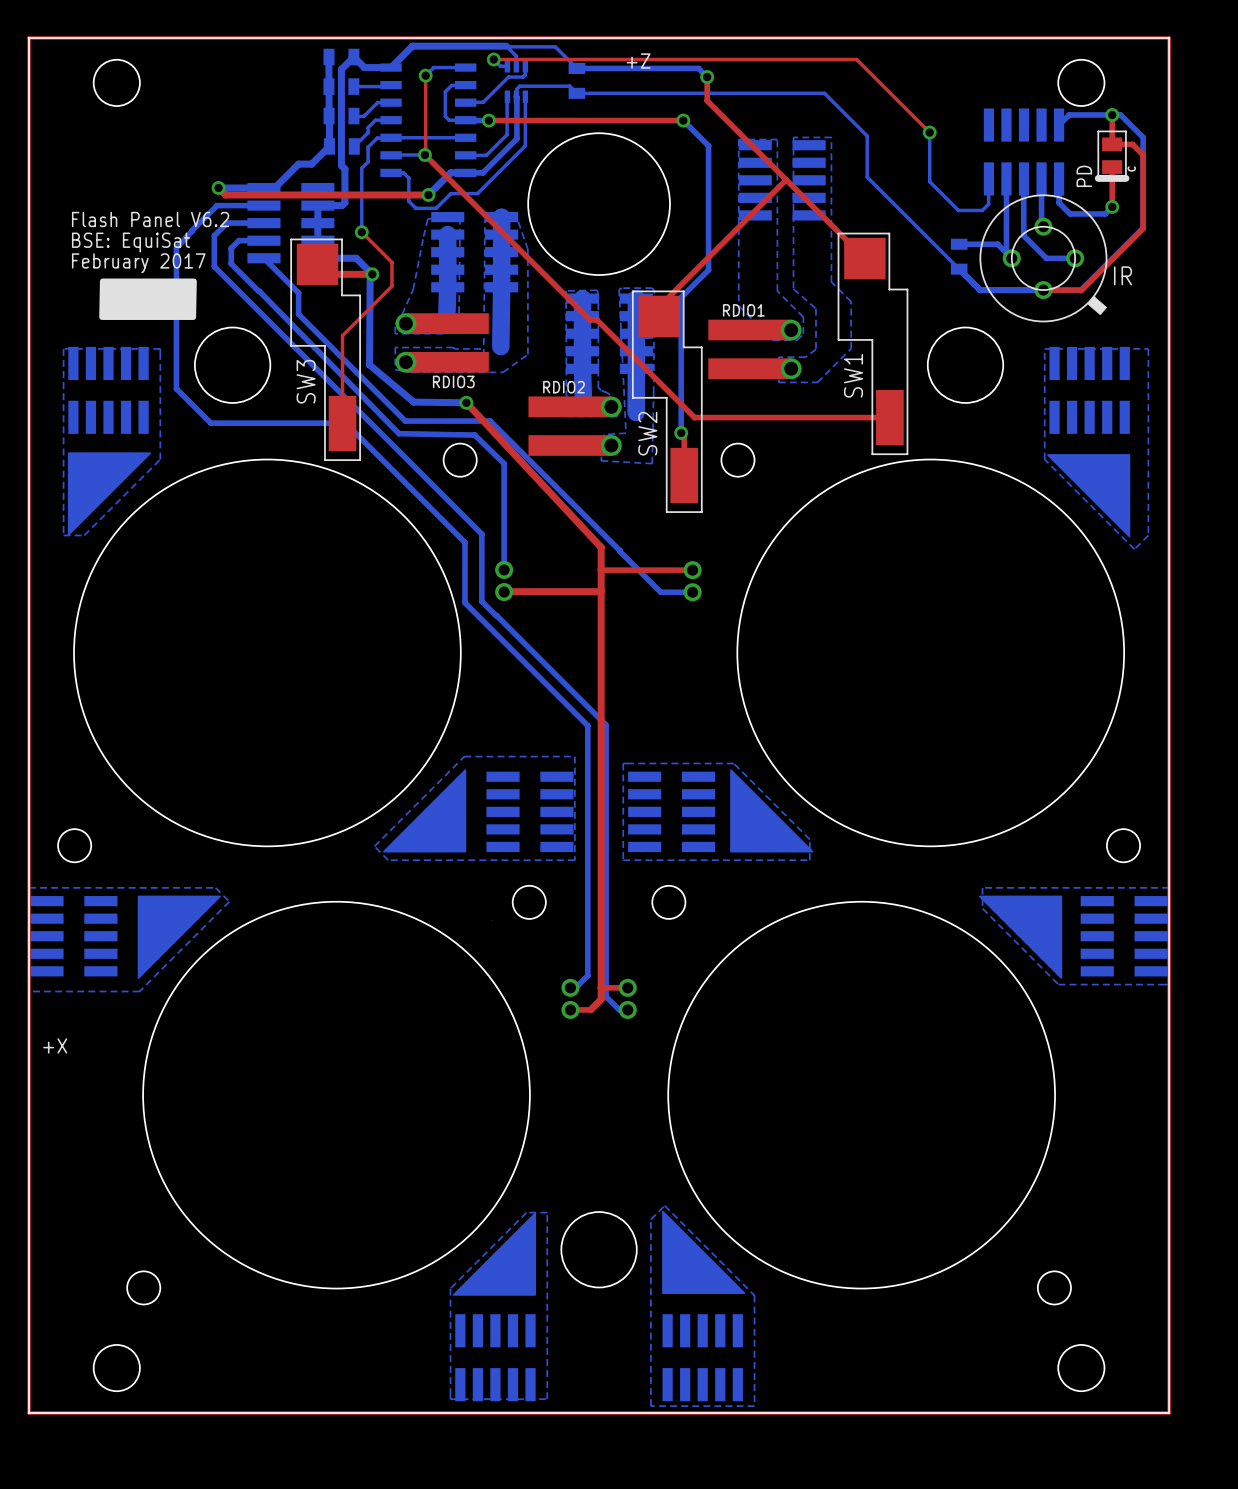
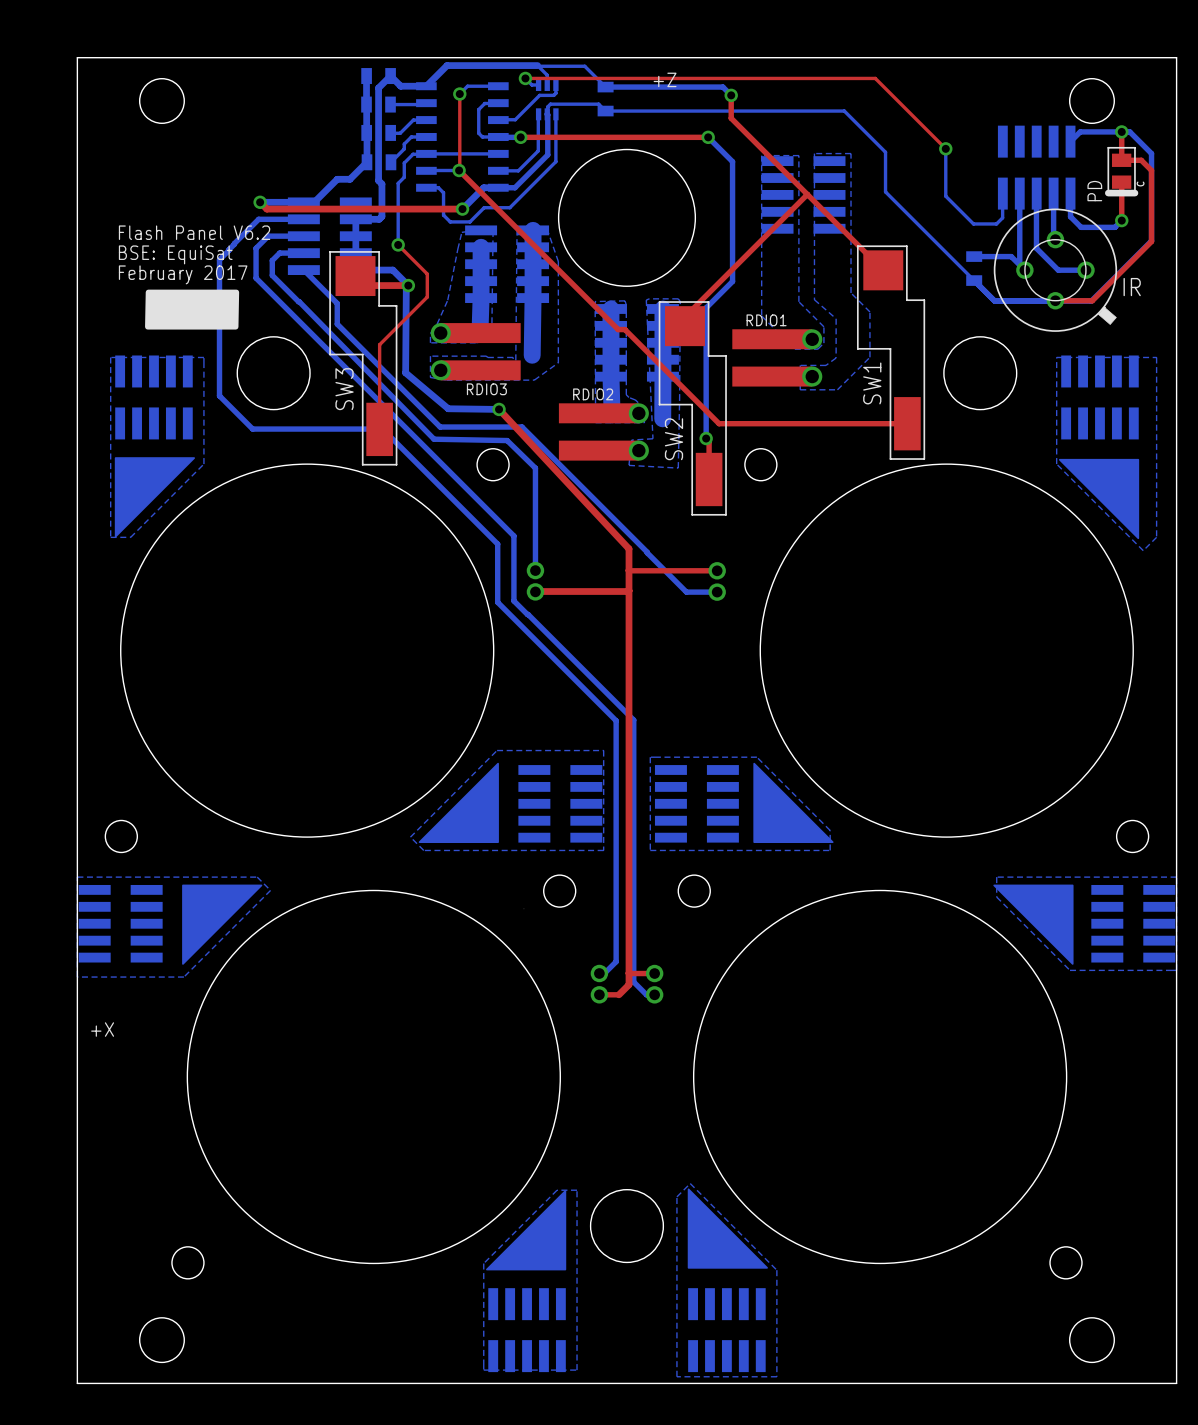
top track: (29, 37) (1169, 37) (1169, 1412) (29, 1412) (29, 37) -> none

